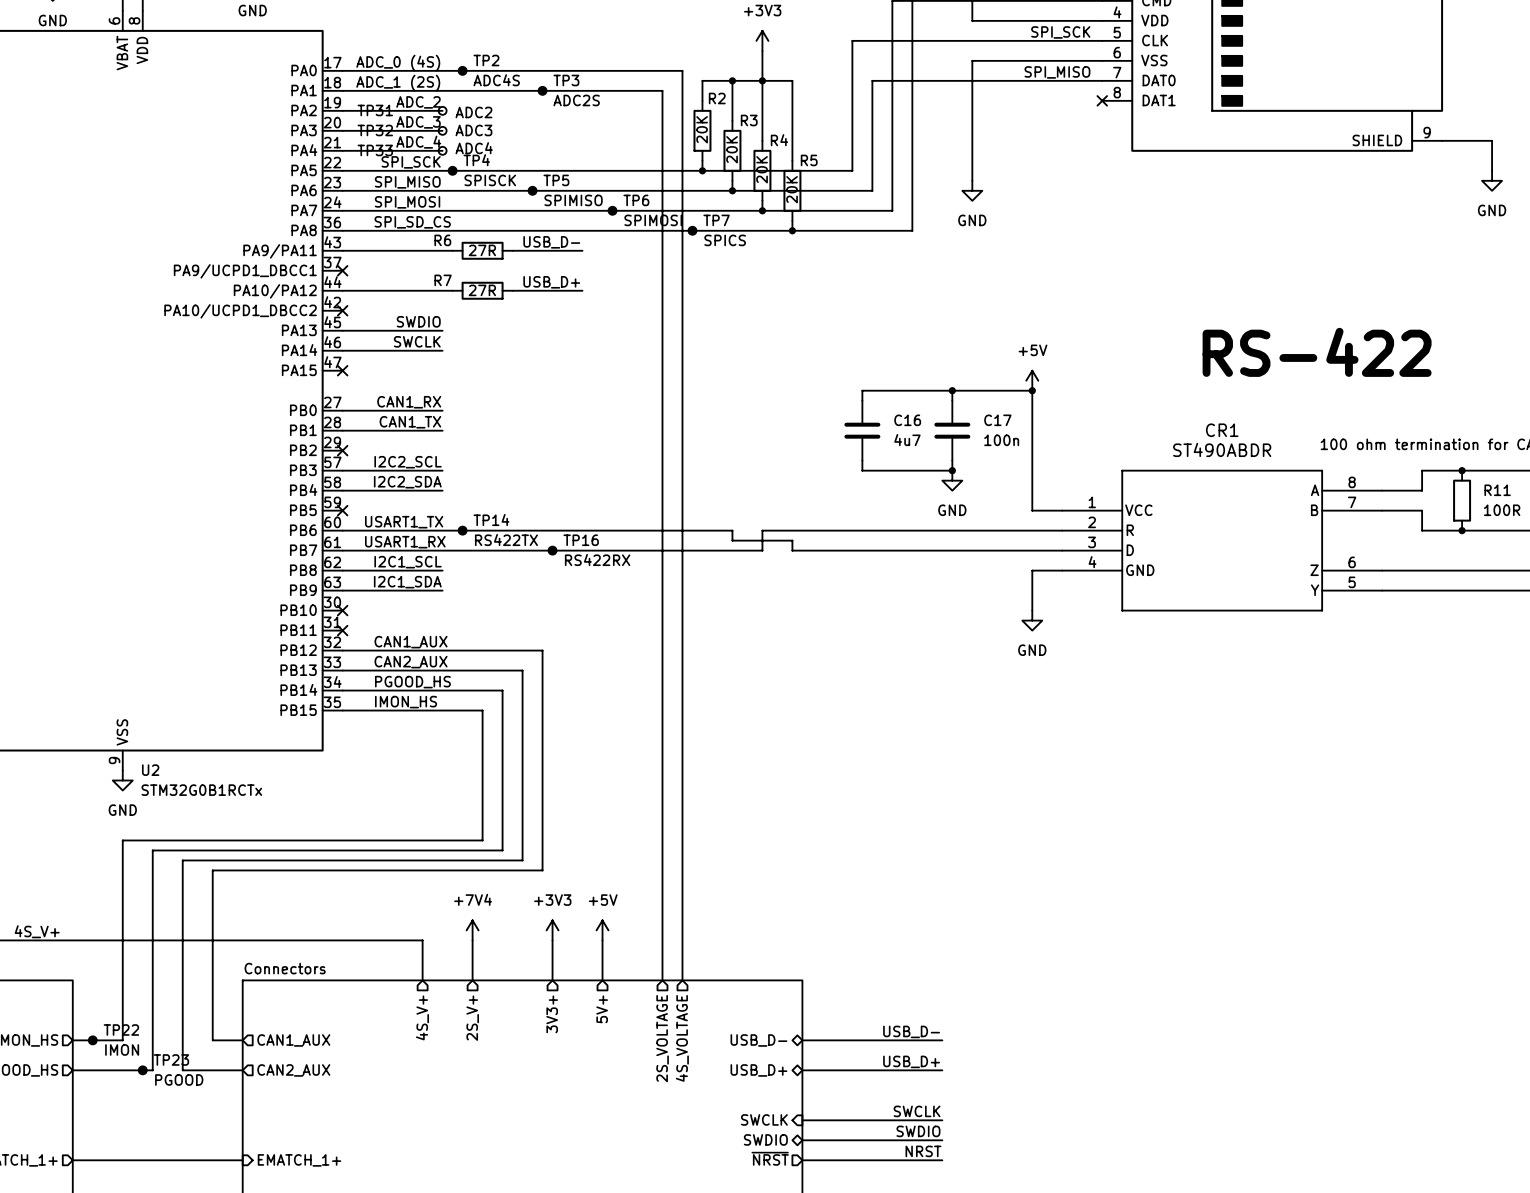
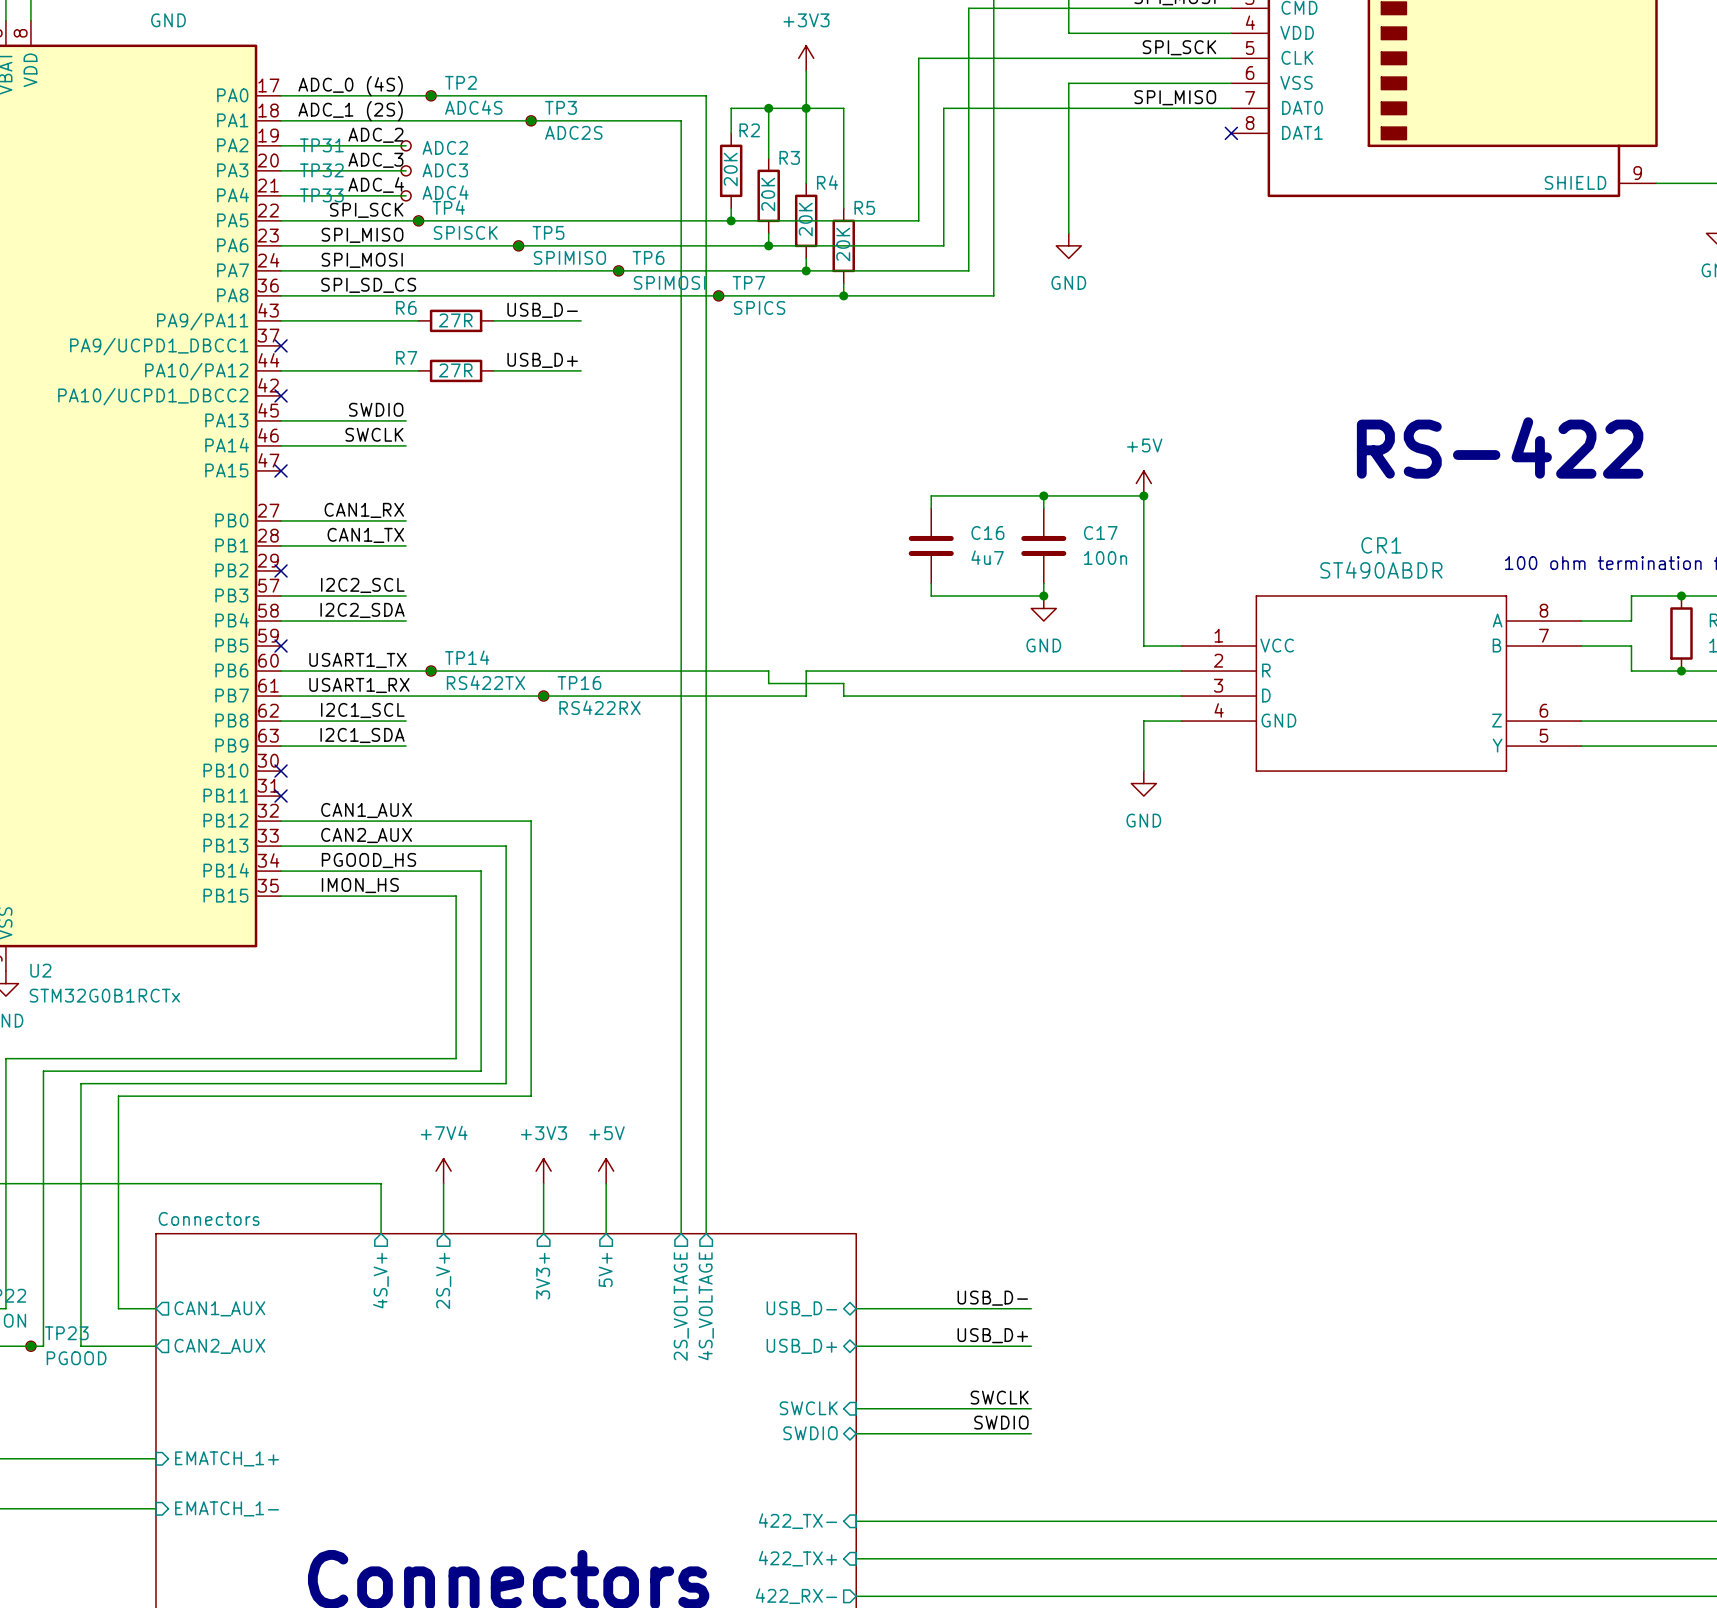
label: NRST (923, 1151) -> none
sheet pin: ~{NRST} (770, 1158) -> none
wire: (802, 1160) (942, 1160) -> none

